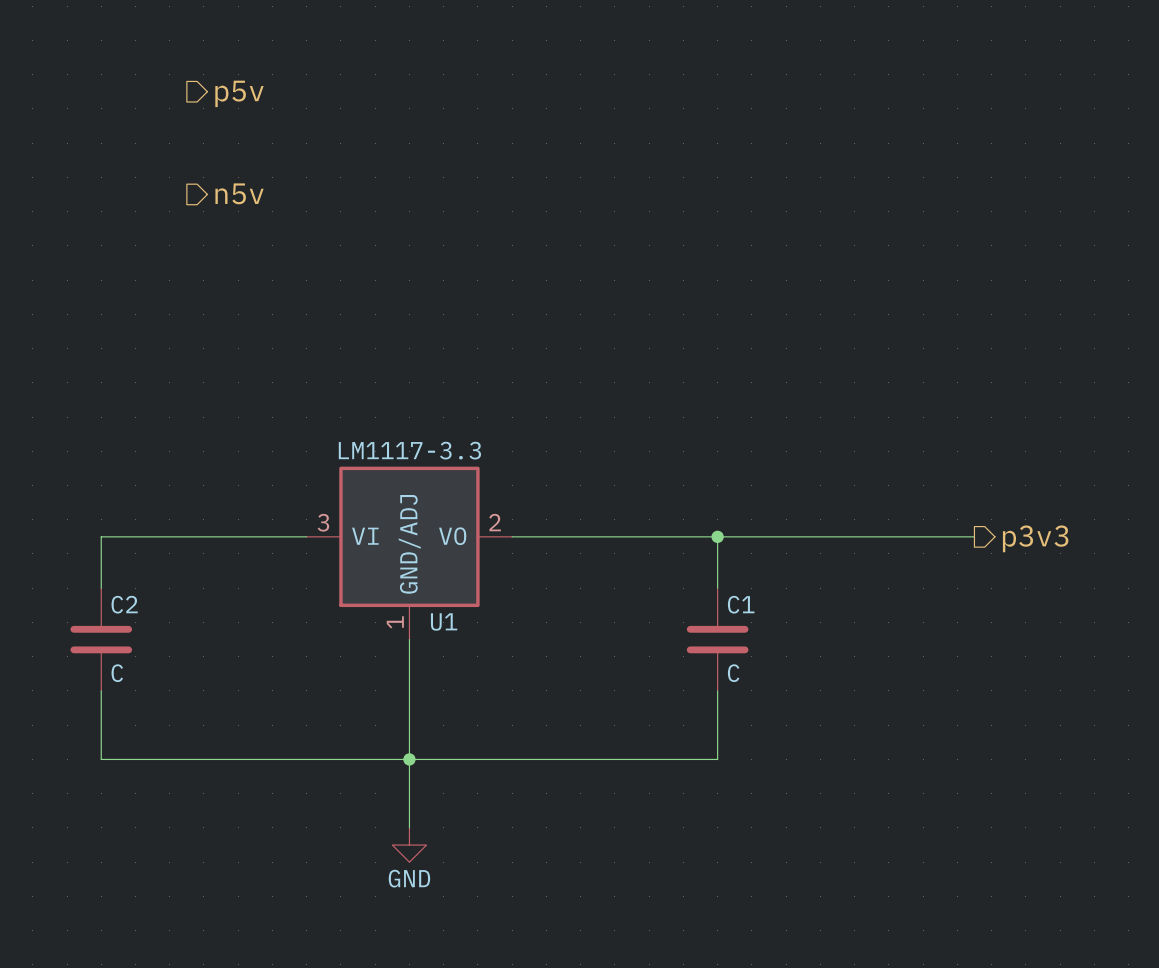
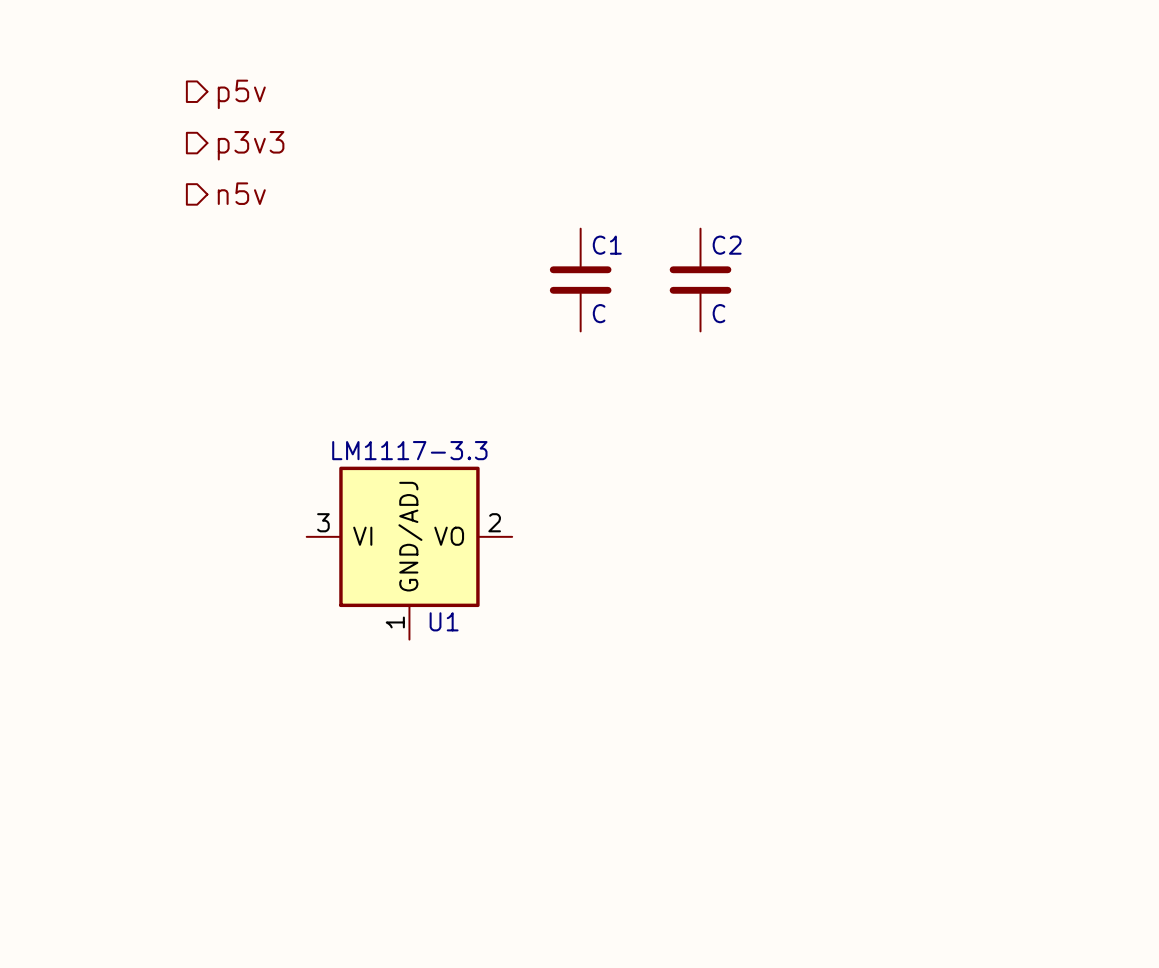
hierarchical label: none -> p3v3 (251, 145)
wire: (306, 536) (101, 536) (101, 588) -> none
wire: (512, 536) (974, 536) -> none
wire: (717, 536) (717, 588) -> none
junction: (717, 536) -> none
hierarchical label: p3v3 (1035, 538) -> none
C2 position: (101, 639) -> (700, 280)
wire: (409, 639) (409, 827) -> none
C1 position: (717, 639) -> (580, 280)
wire: (101, 690) (101, 759) (717, 759) (717, 690) -> none
junction: (409, 759) -> none
power symbol: GND (409, 845) -> none

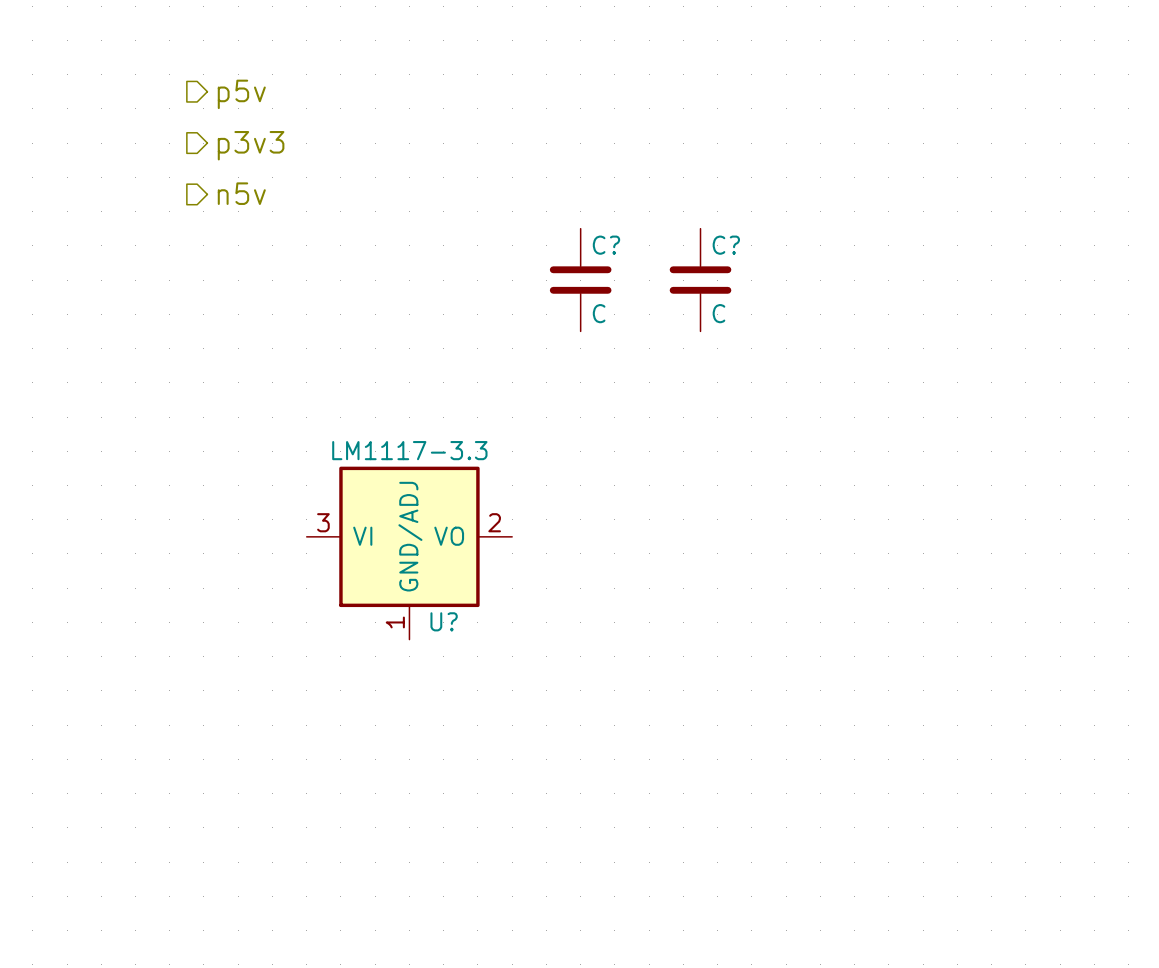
C1 name: C1 (607, 245) -> C? (606, 245)
C2 name: C2 (727, 245) -> C? (726, 245)
U1 name: U1 (444, 621) -> U? (444, 621)

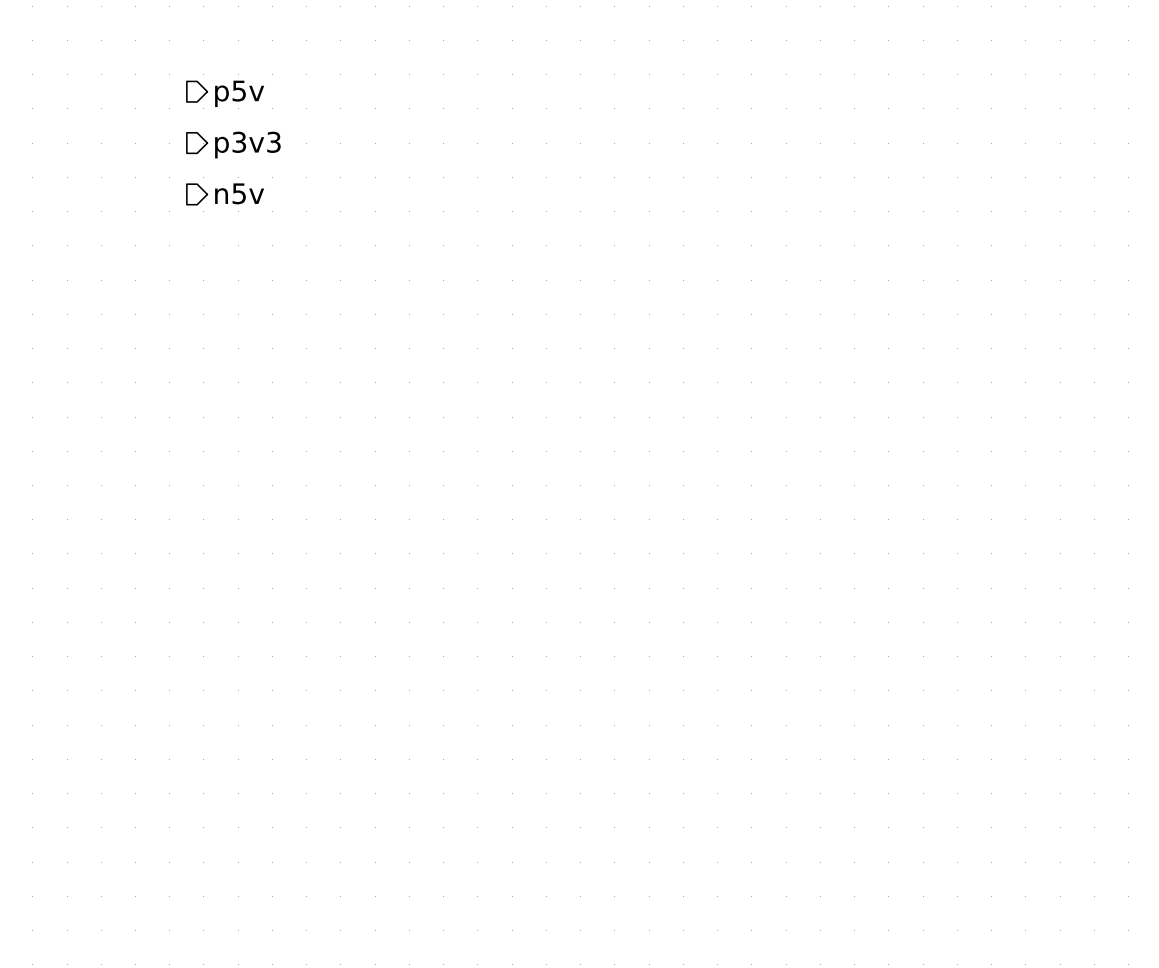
C?: C (580, 280) -> none
C?: C (700, 280) -> none
U?: LM1117-3.3 (409, 553) -> none

